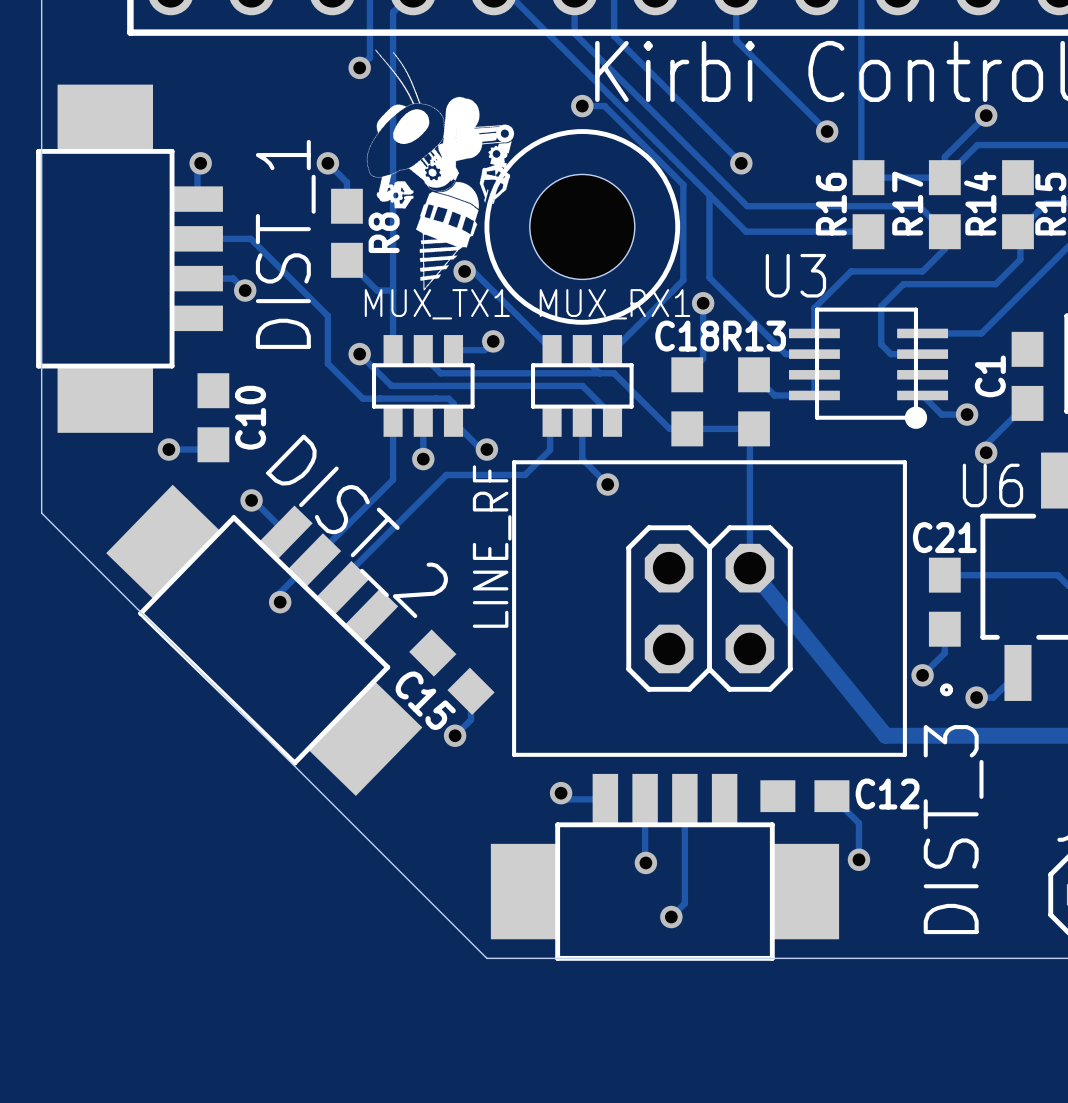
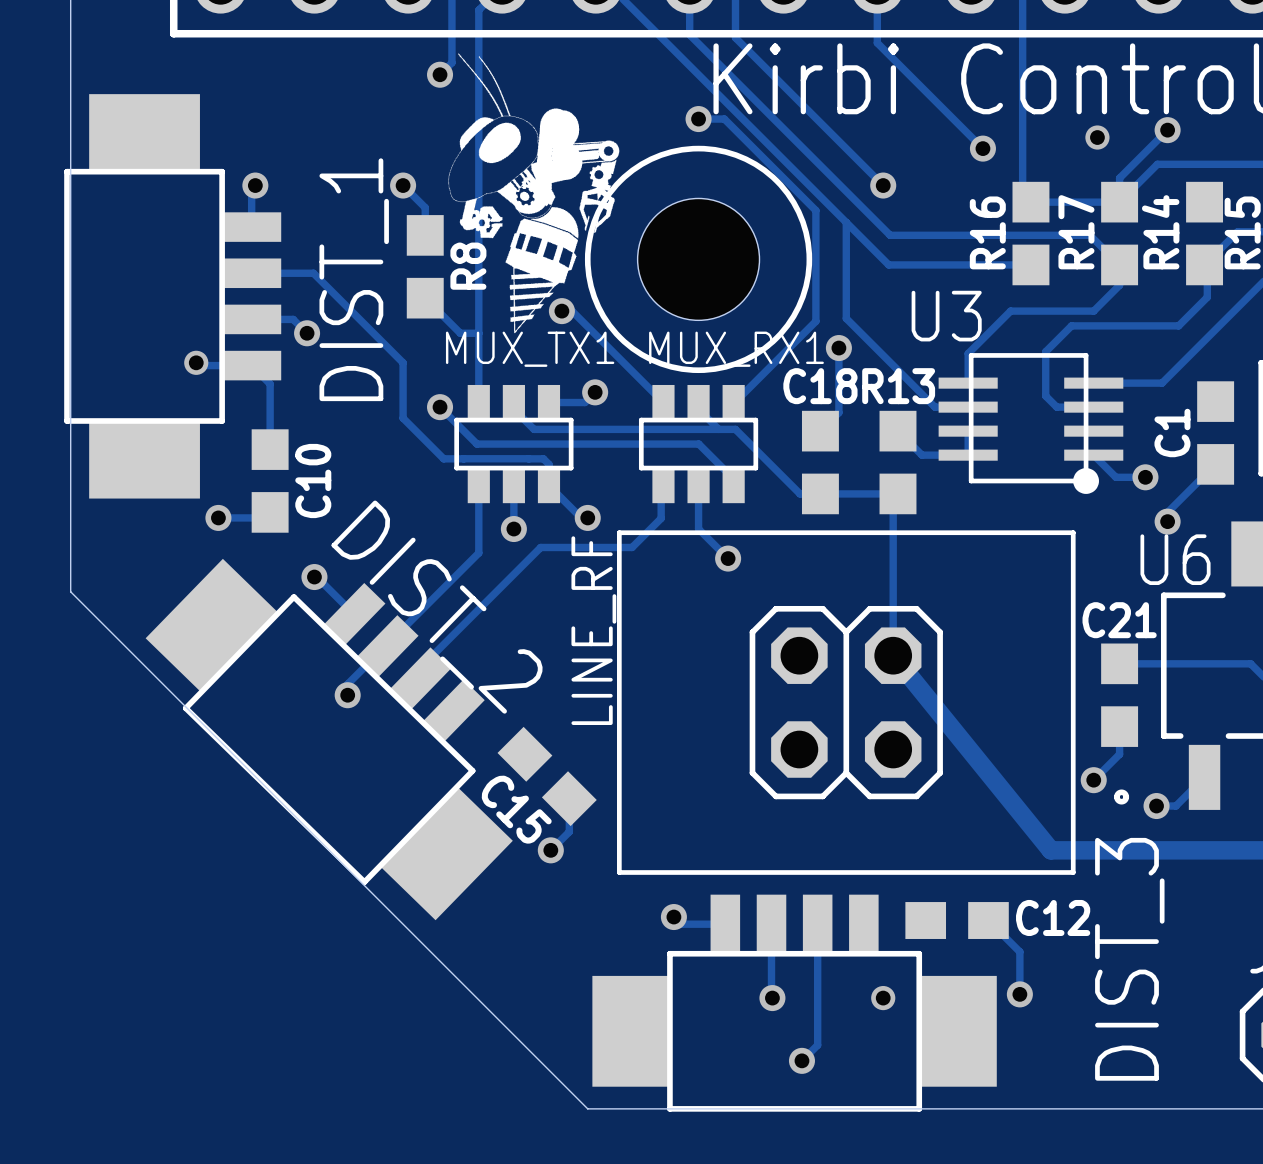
via: none -> (1097, 137)
track: none -> (196, 362) (199, 365) (251, 365) (270, 384) (270, 449)
via: none -> (196, 362)
via: none -> (883, 998)

